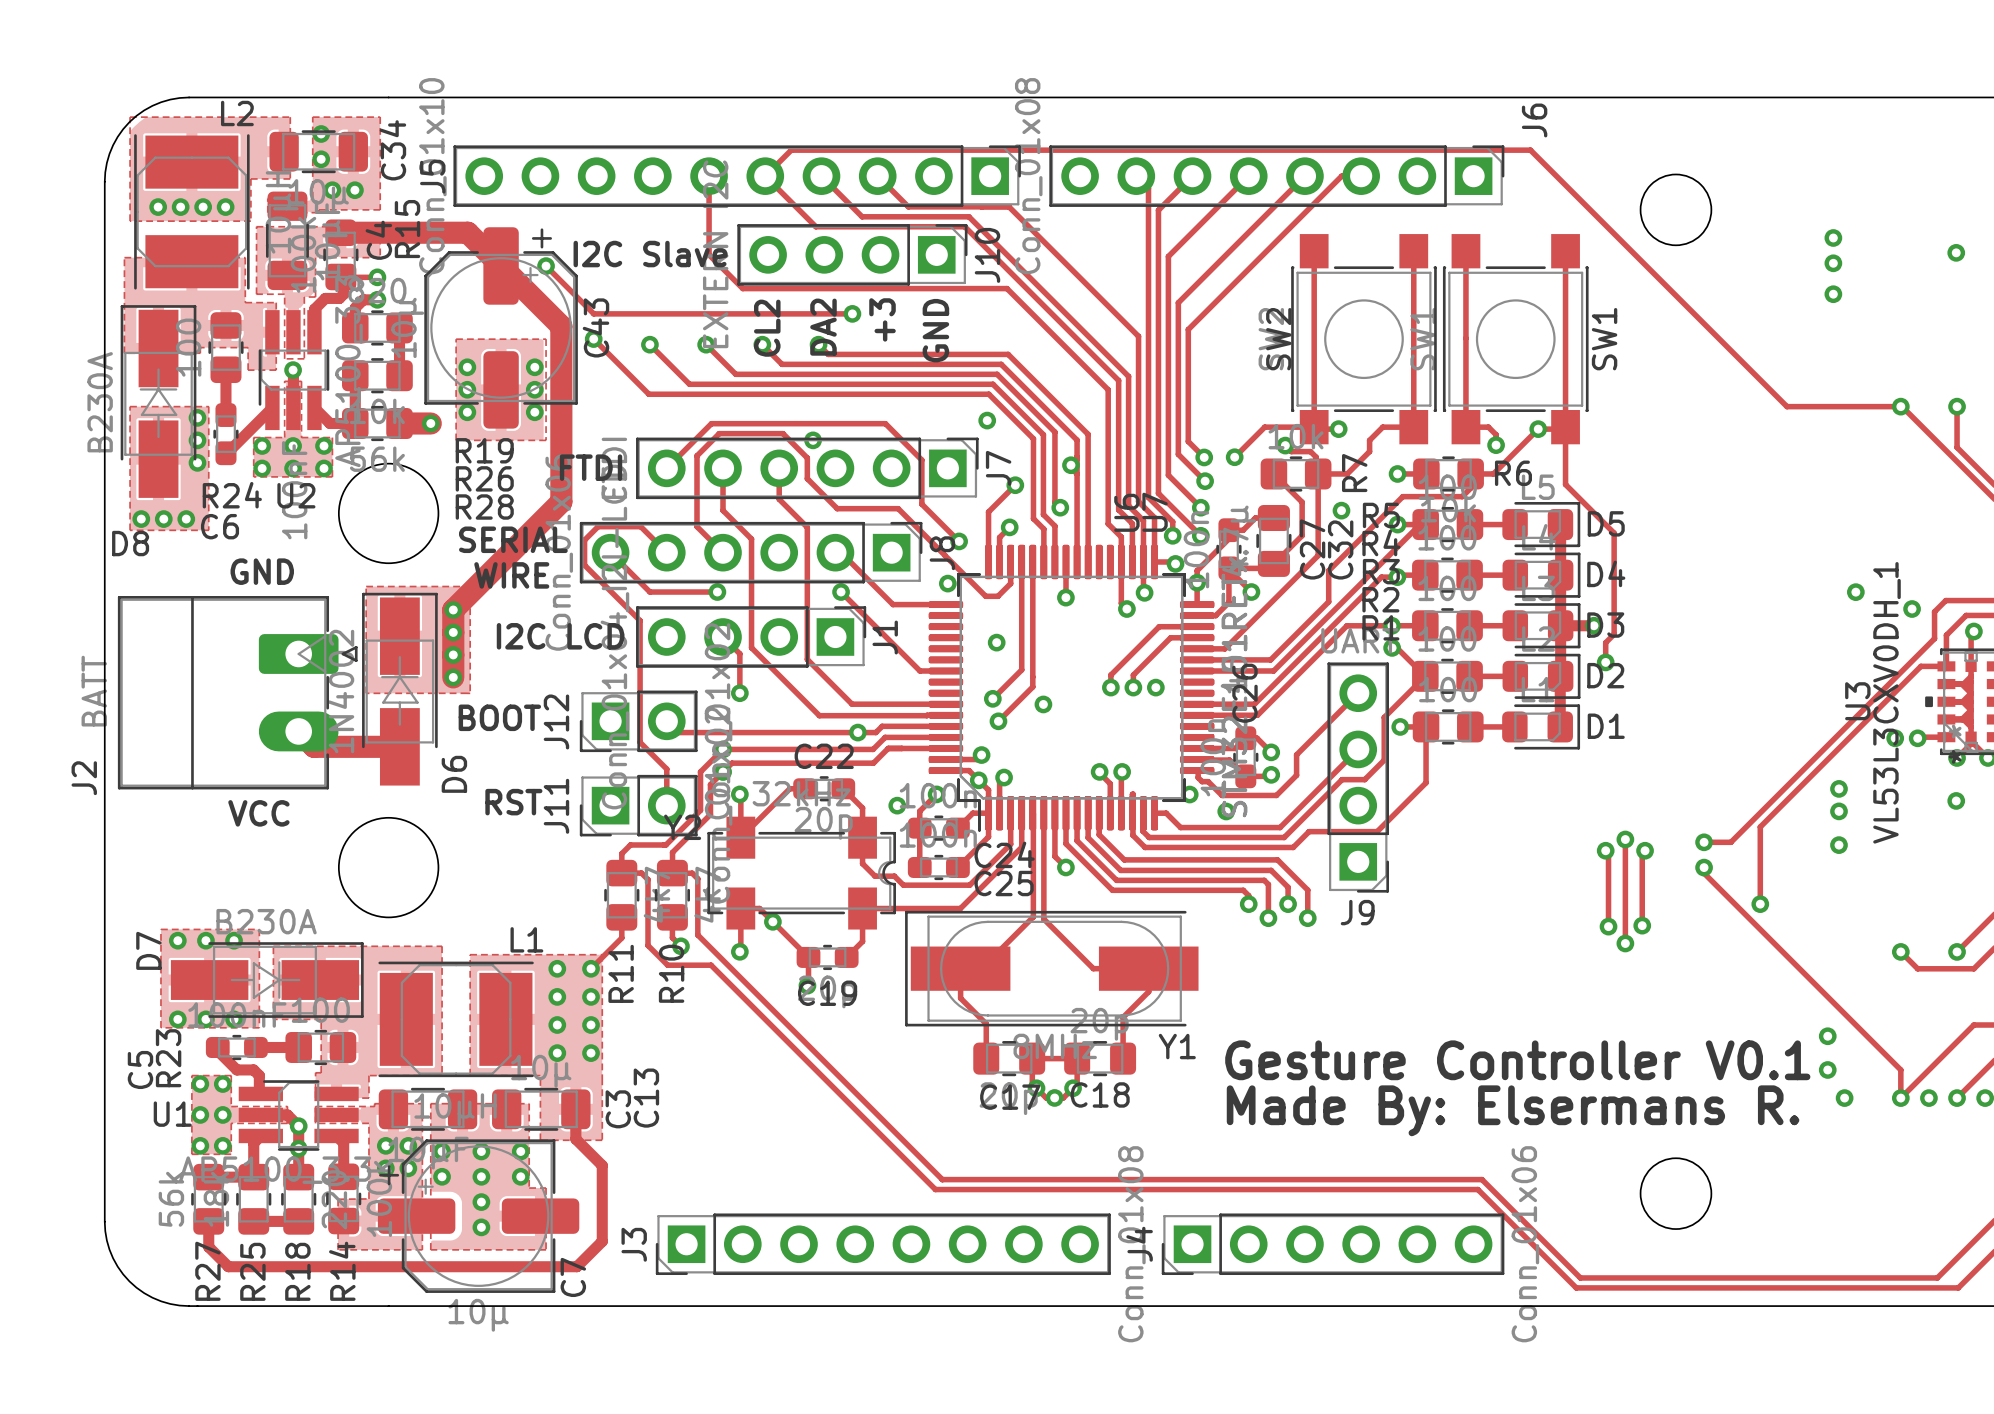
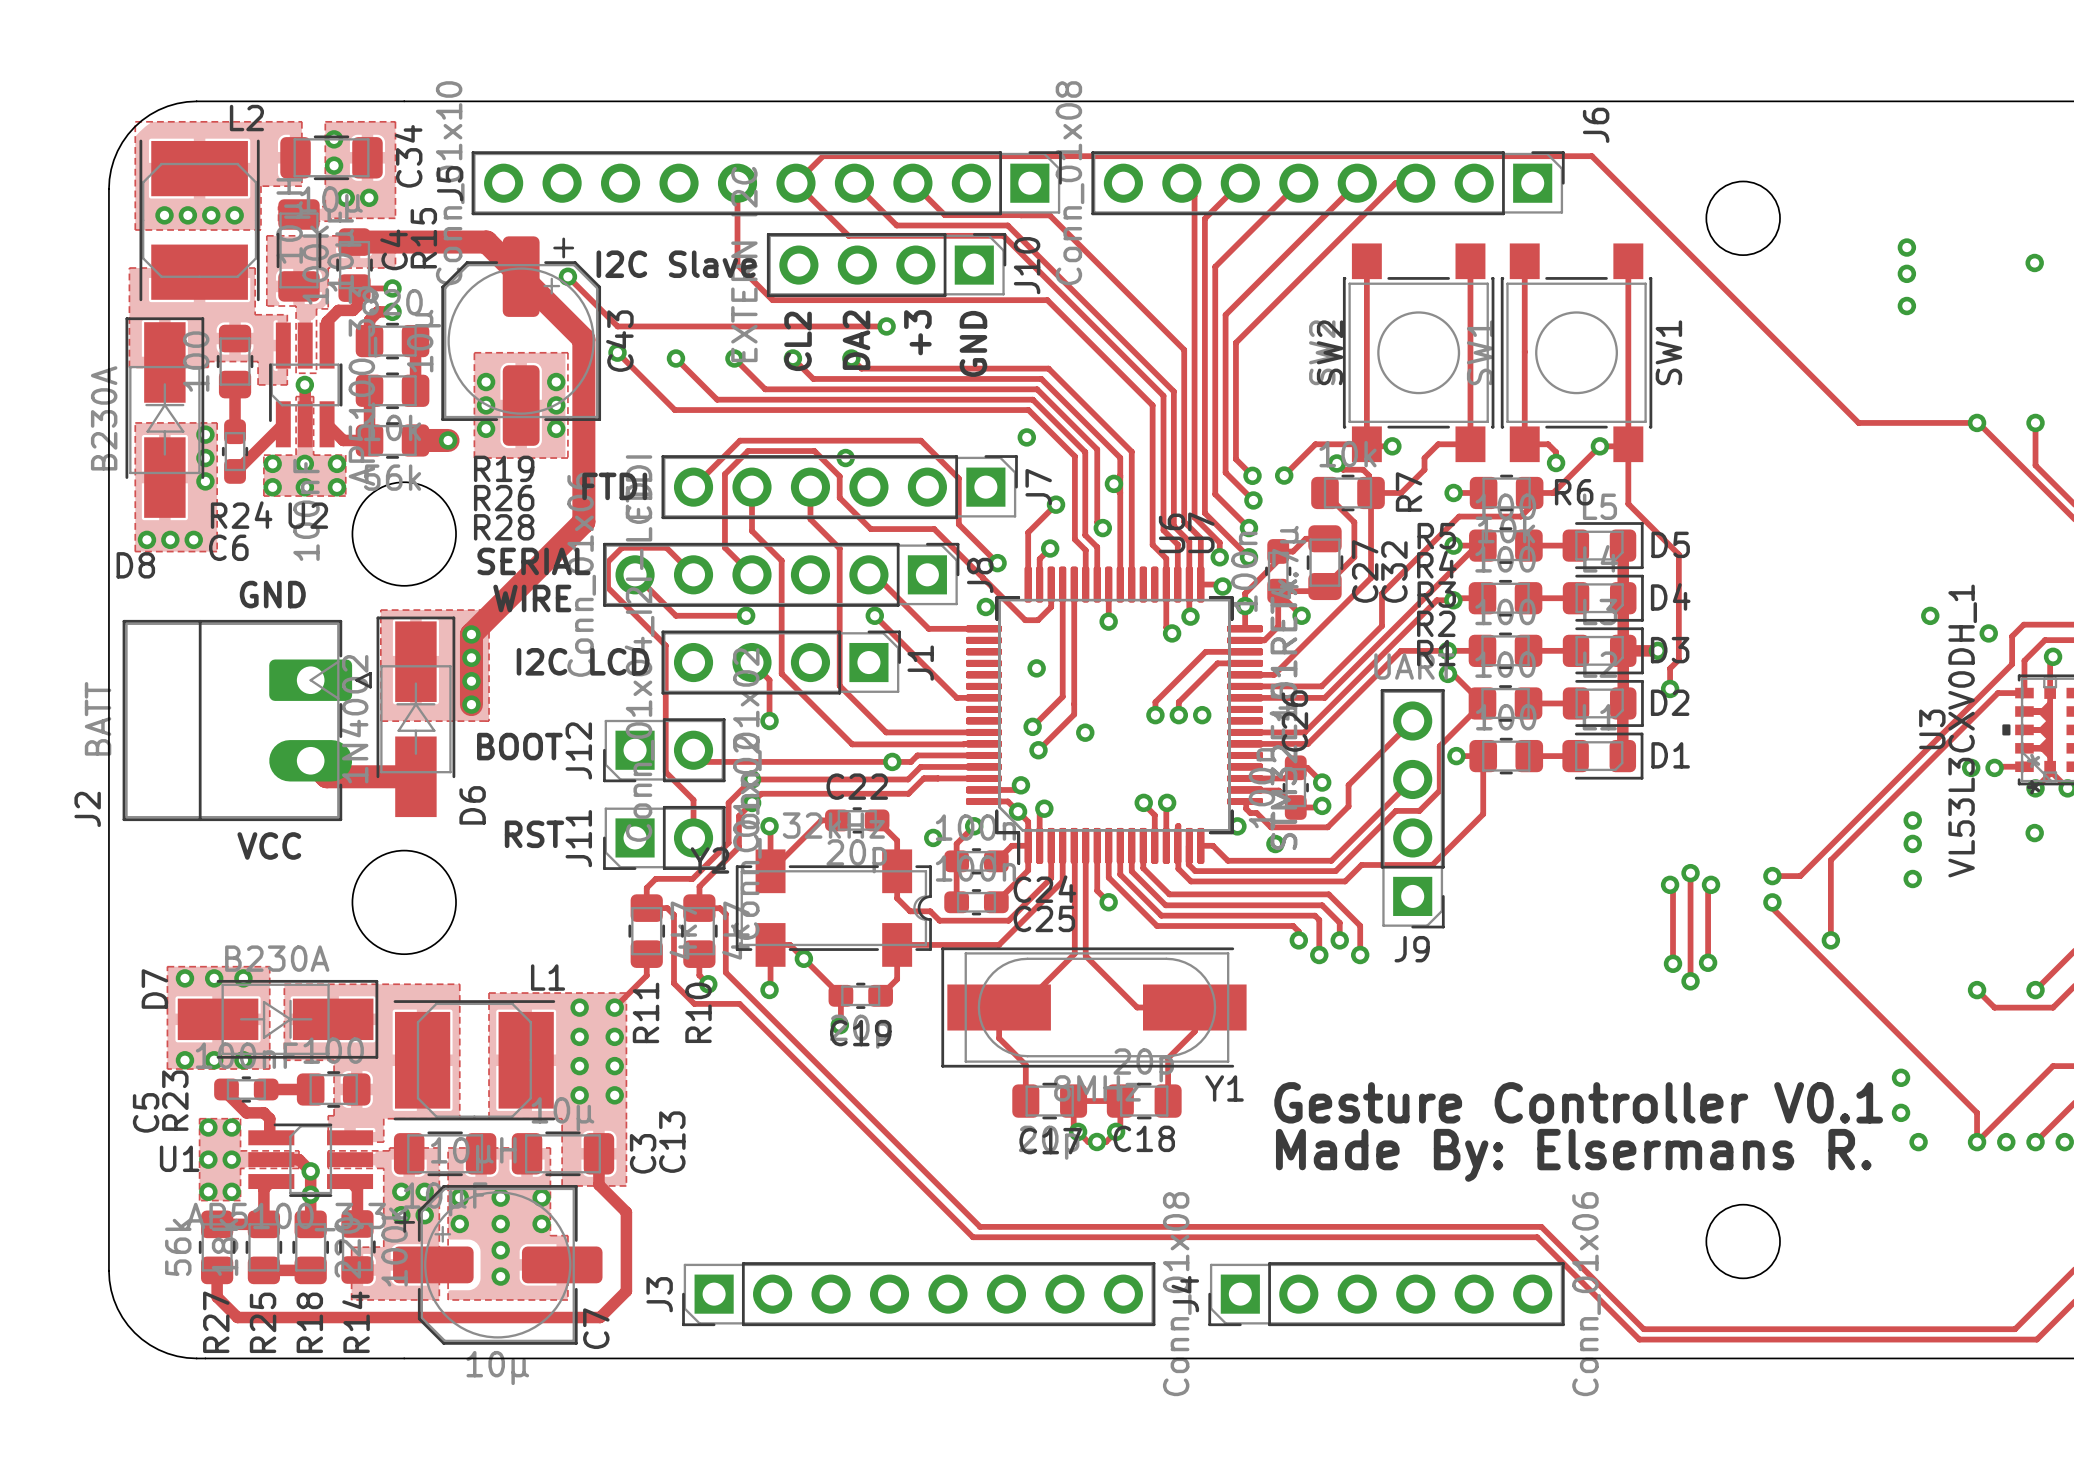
via: (1341, 510) -> none

